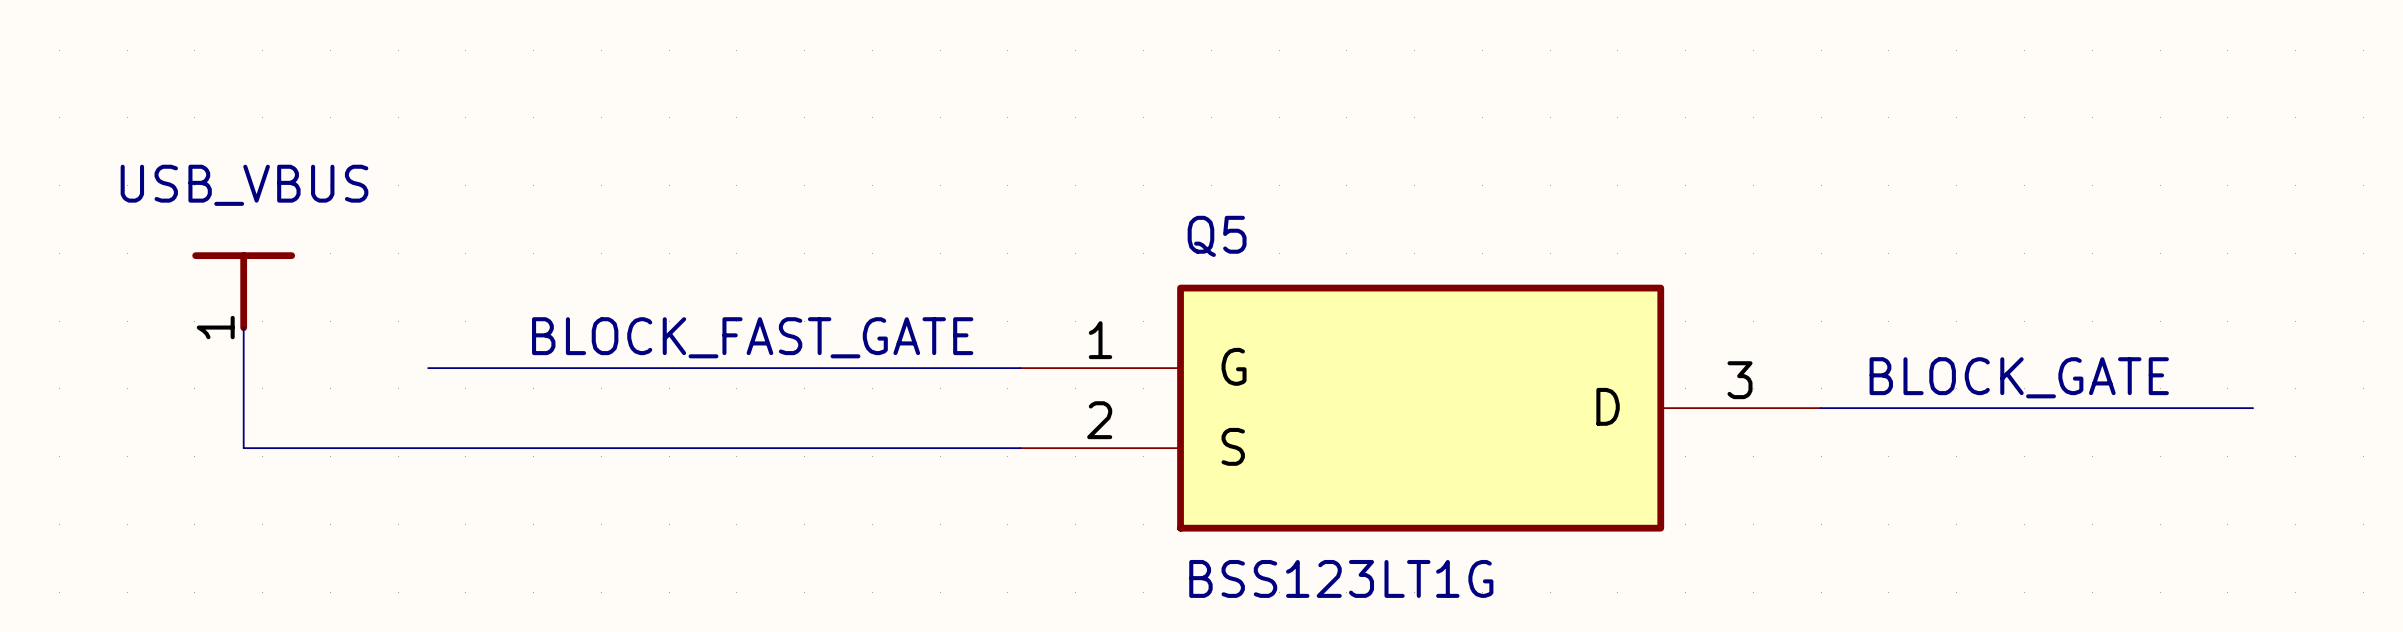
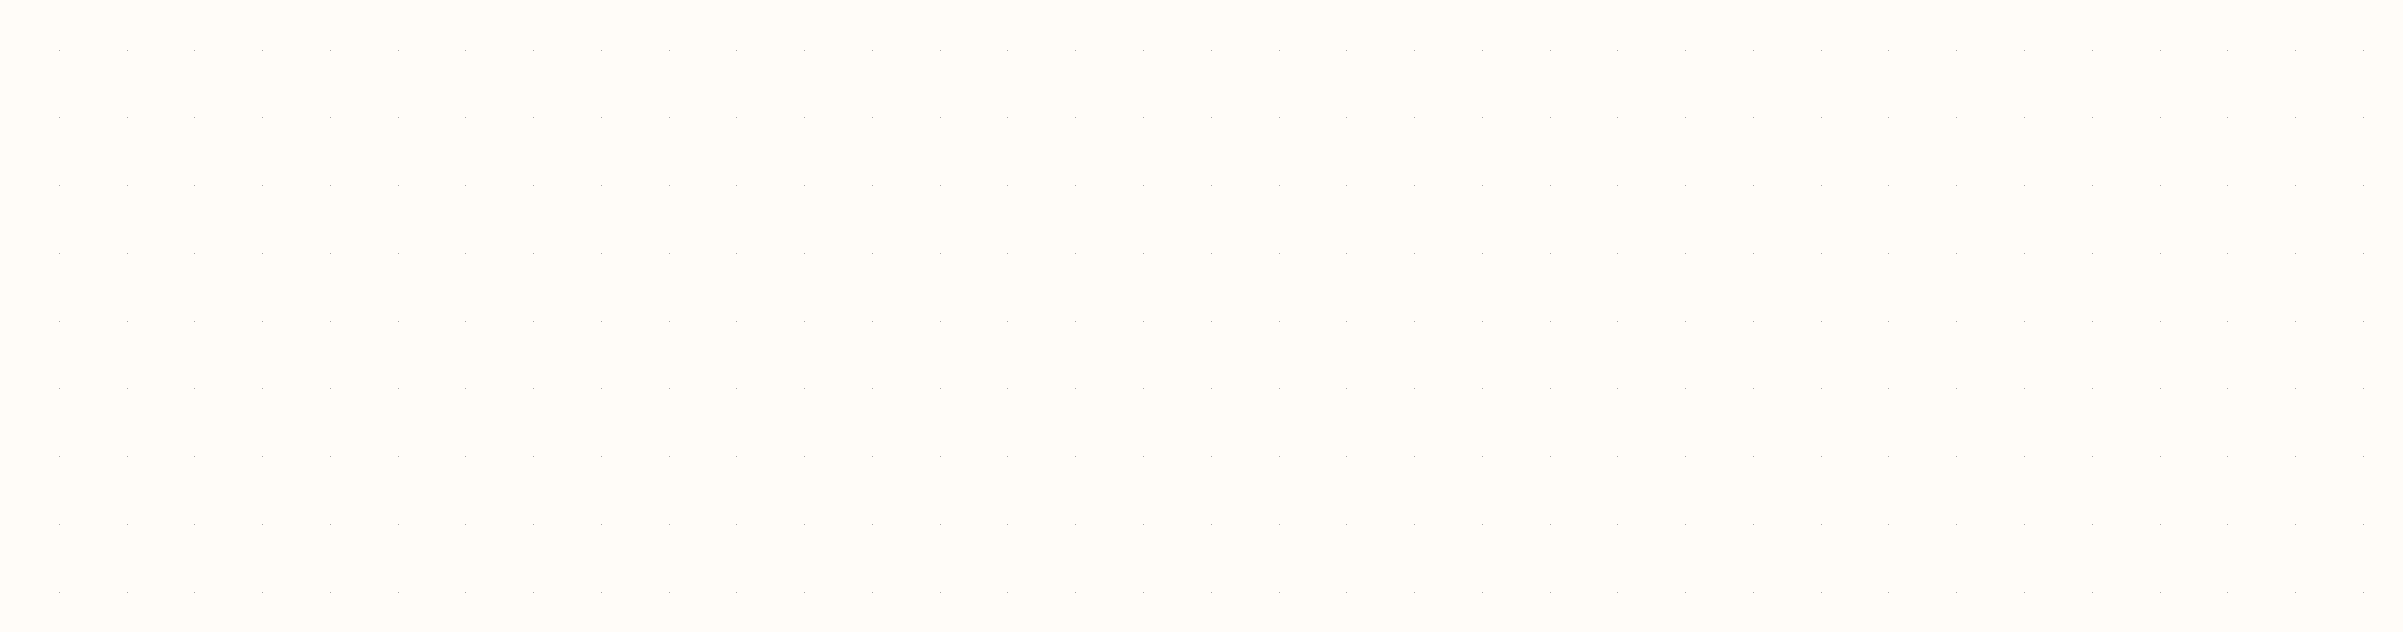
USB_VBUS: (243, 291) -> none
wire: (243, 327) (243, 448) (1020, 448) -> none
text: BLOCK_FAST_GATE (752, 337) -> none
wire: (428, 368) (1020, 368) -> none
text: BLOCK_GATE (2019, 377) -> none
Q5: BSS123LT1G (1420, 408) -> none
wire: (1820, 408) (2253, 408) -> none

